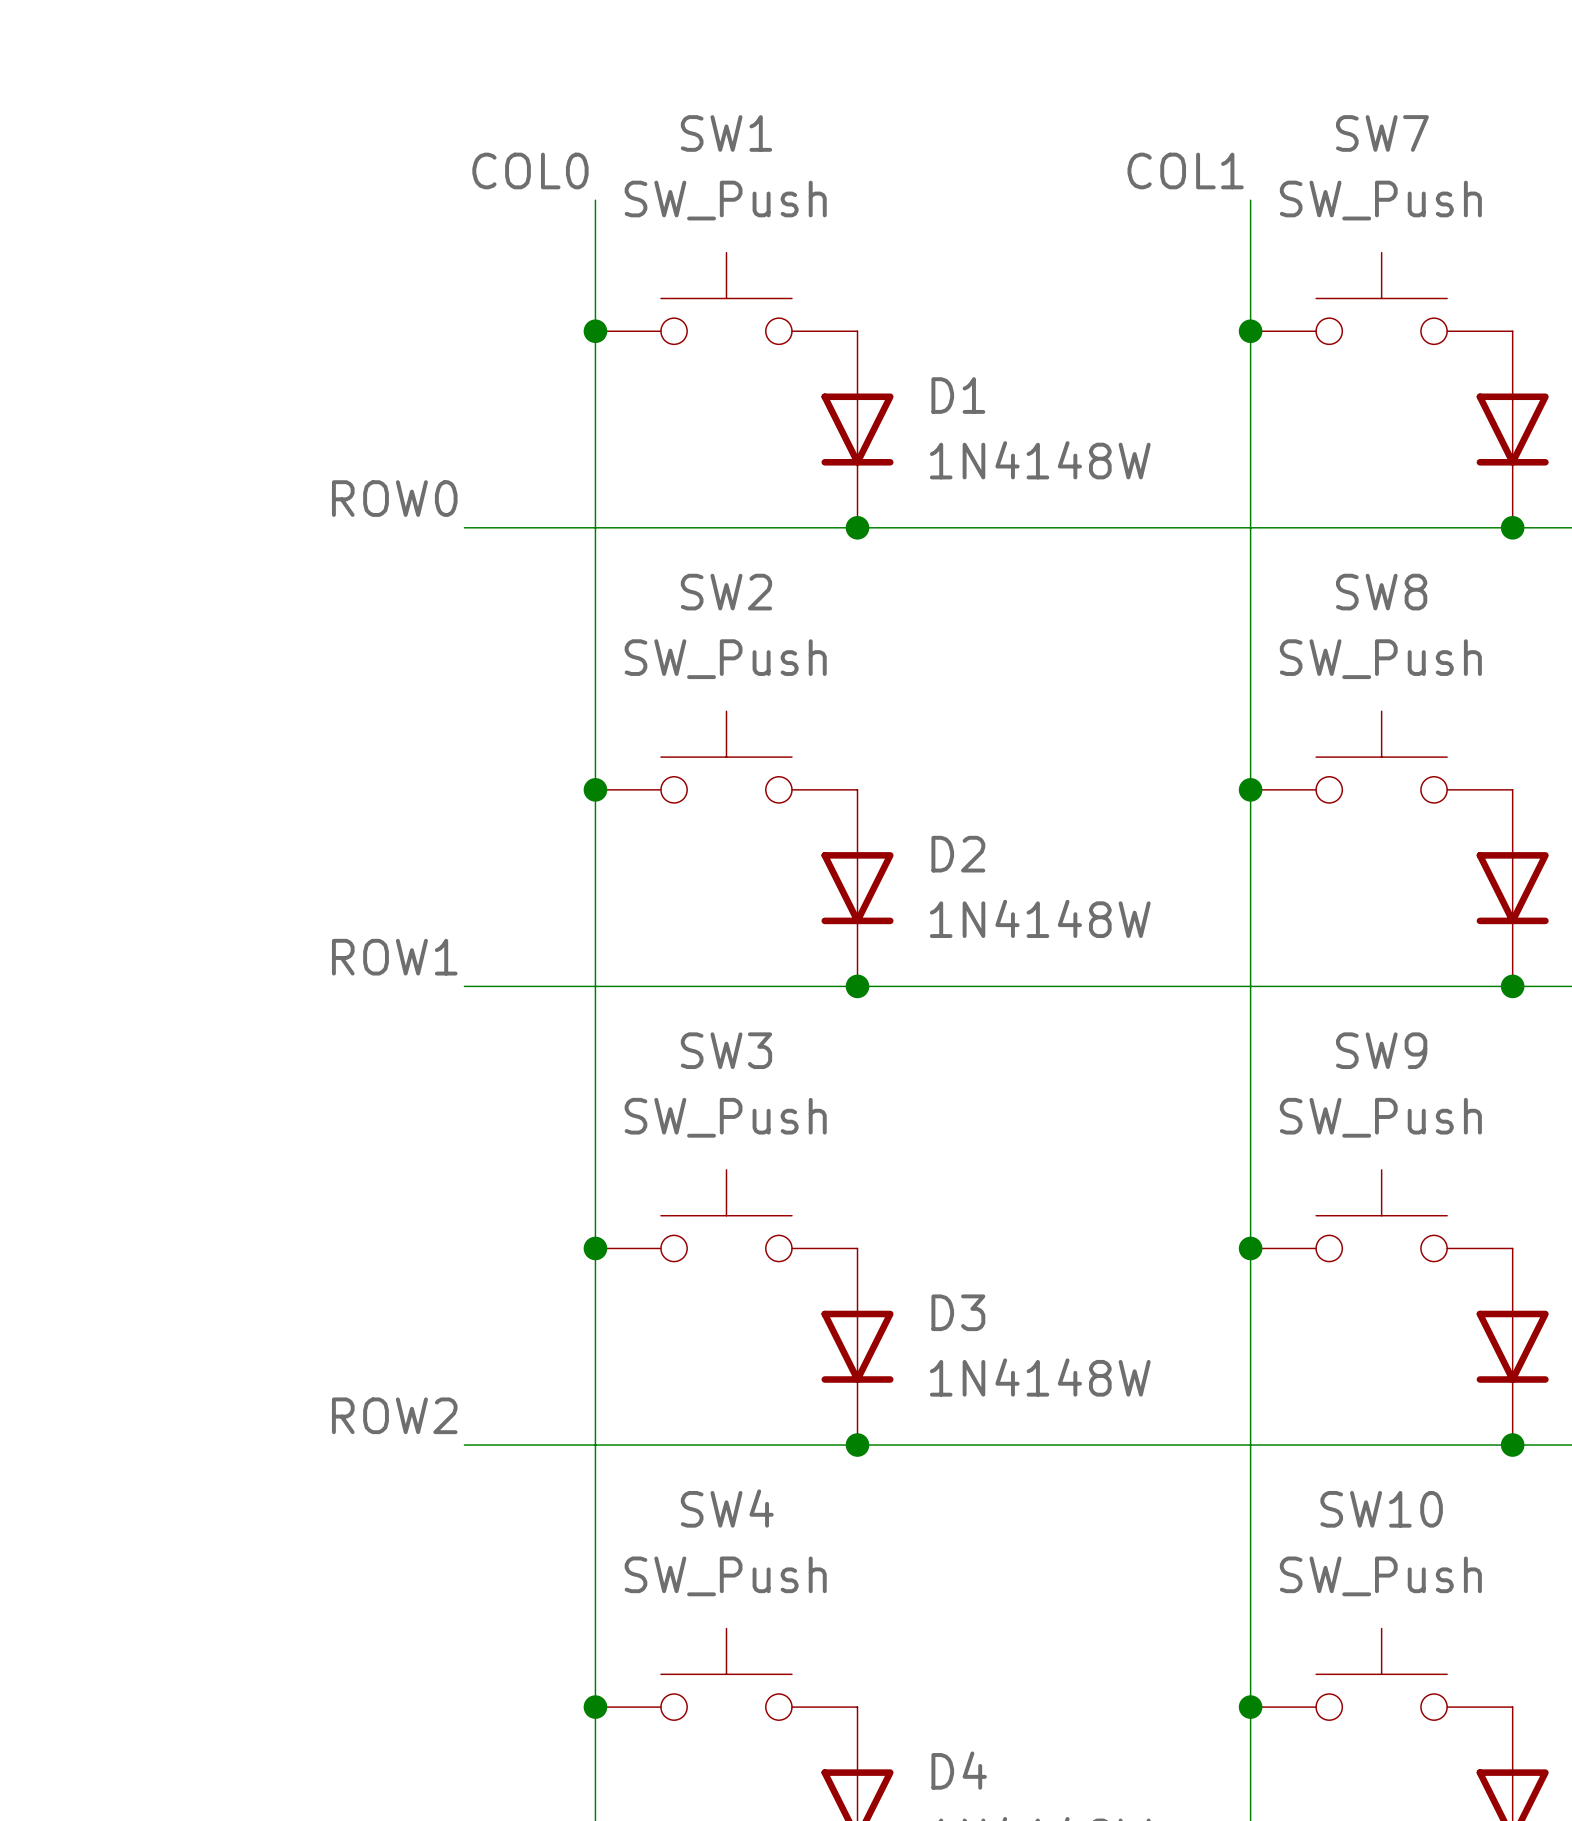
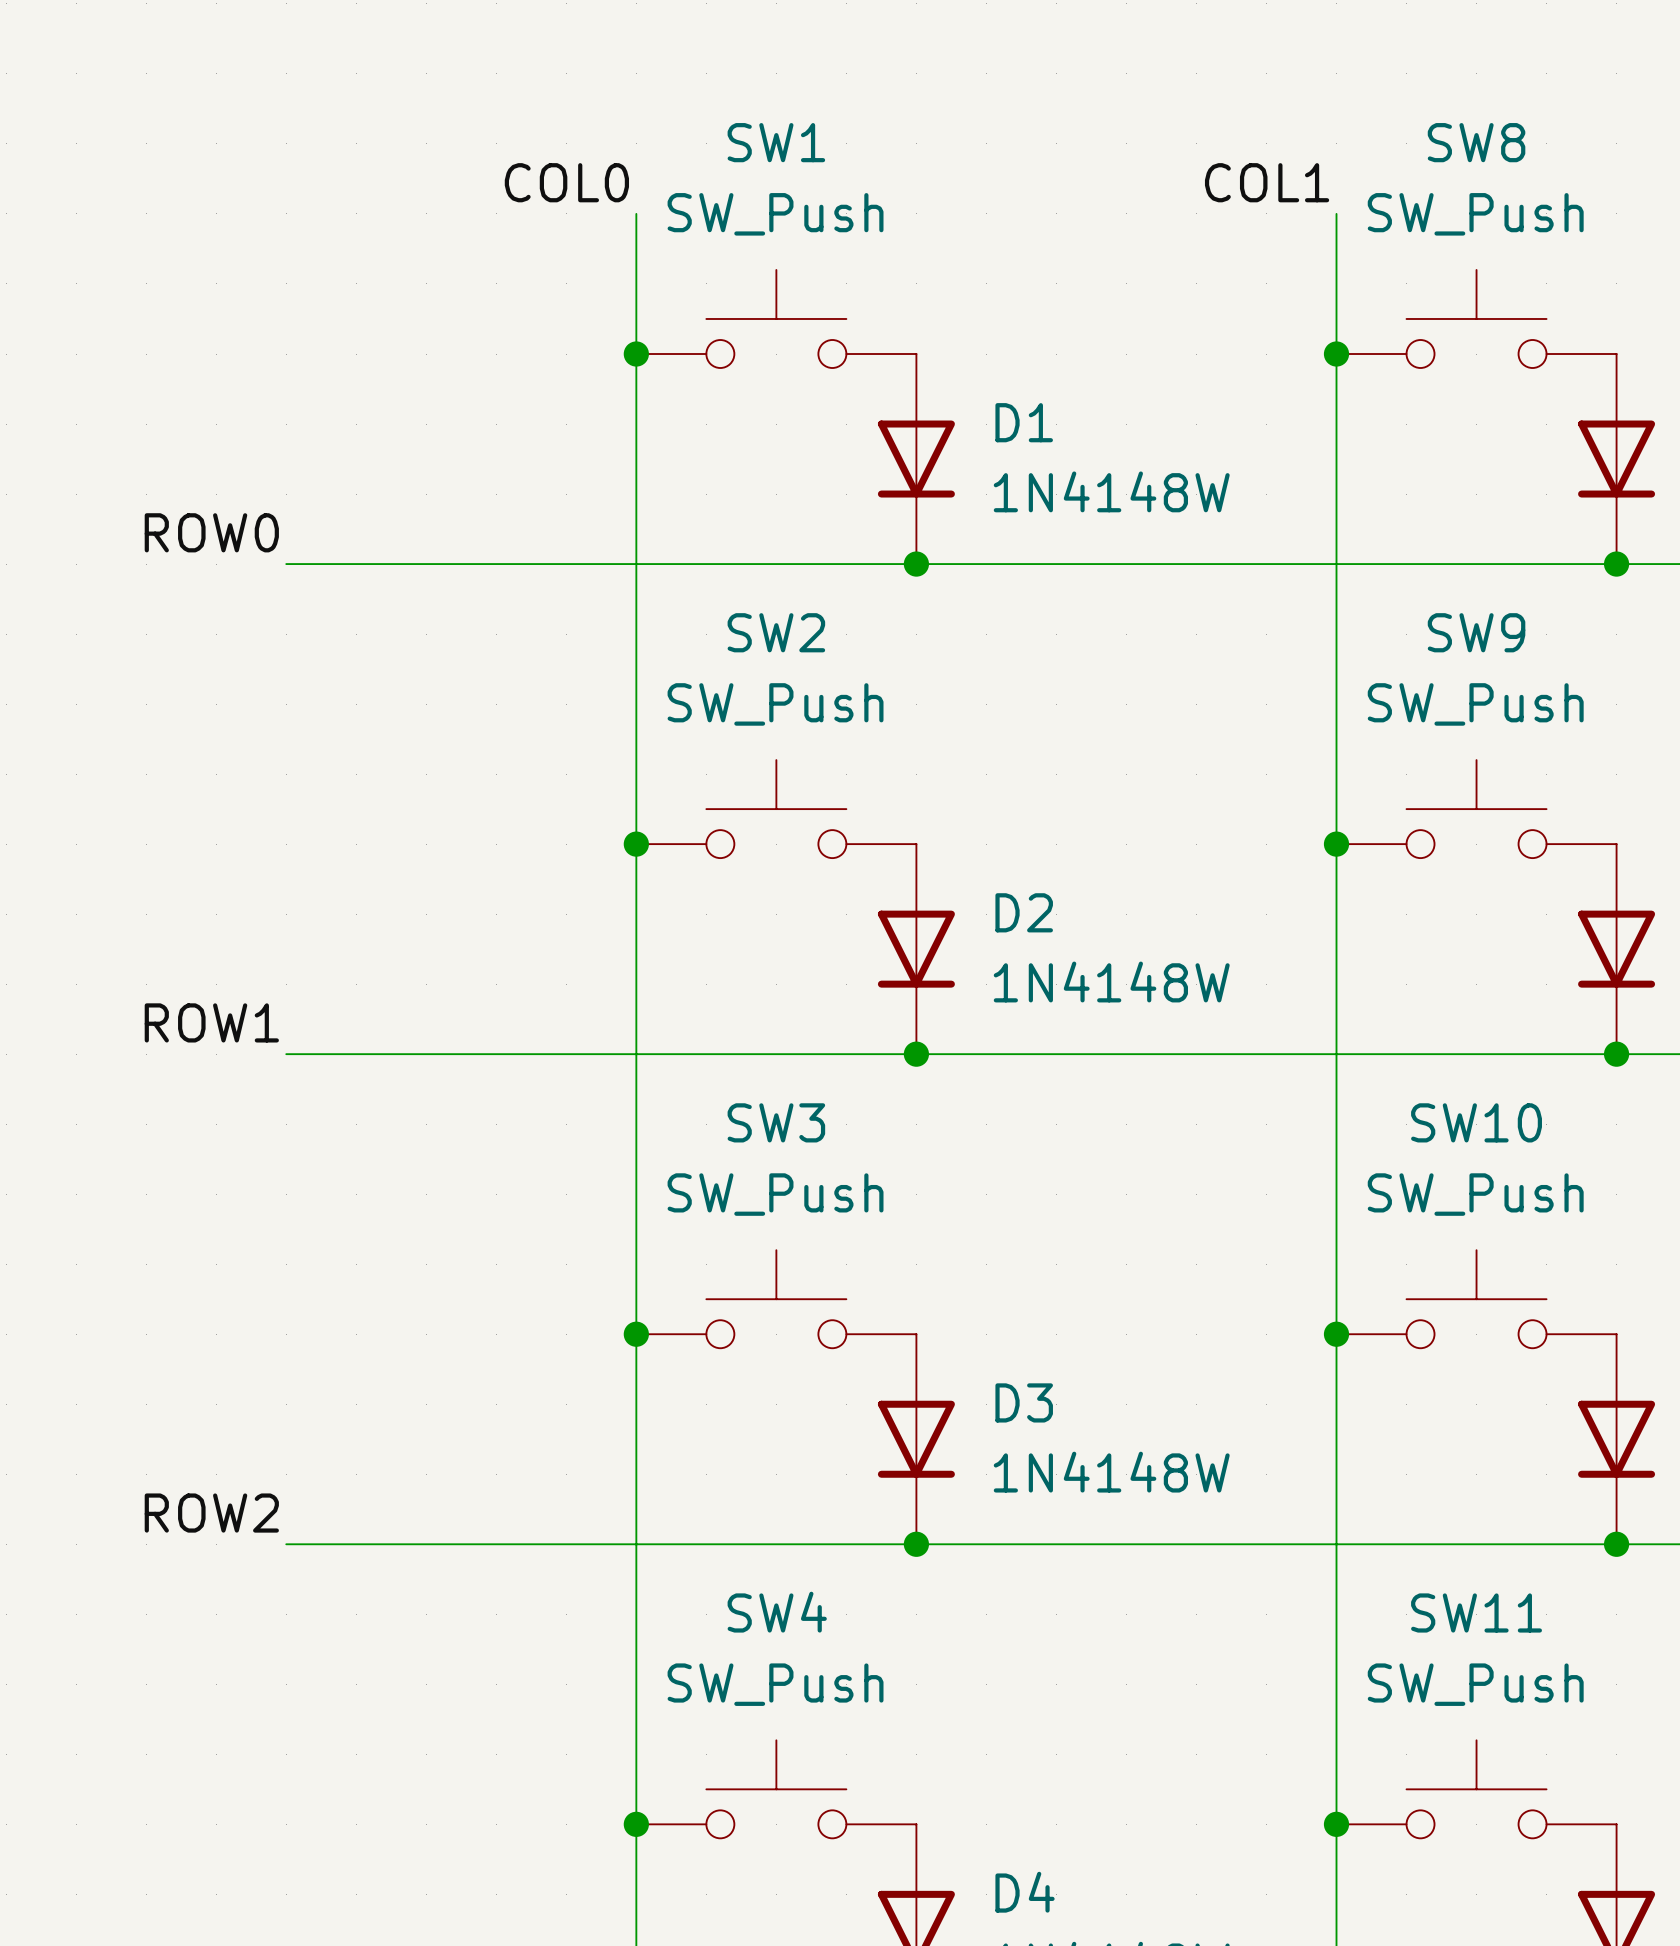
SW7 name: SW7 (1382, 133) -> SW8 (1476, 142)
label position: ROW0 (394, 498) -> ROW0 (211, 532)
wire: none -> (286, 564) (496, 564)
SW8 name: SW8 (1381, 592) -> SW9 (1476, 632)
label position: ROW1 (394, 957) -> ROW1 (211, 1022)
wire: none -> (286, 1054) (496, 1054)
SW9 name: SW9 (1381, 1050) -> SW10 (1476, 1122)
label position: ROW2 (394, 1415) -> ROW2 (211, 1513)
wire: none -> (286, 1544) (496, 1544)
SW10 name: SW10 (1381, 1509) -> SW11 (1476, 1612)

